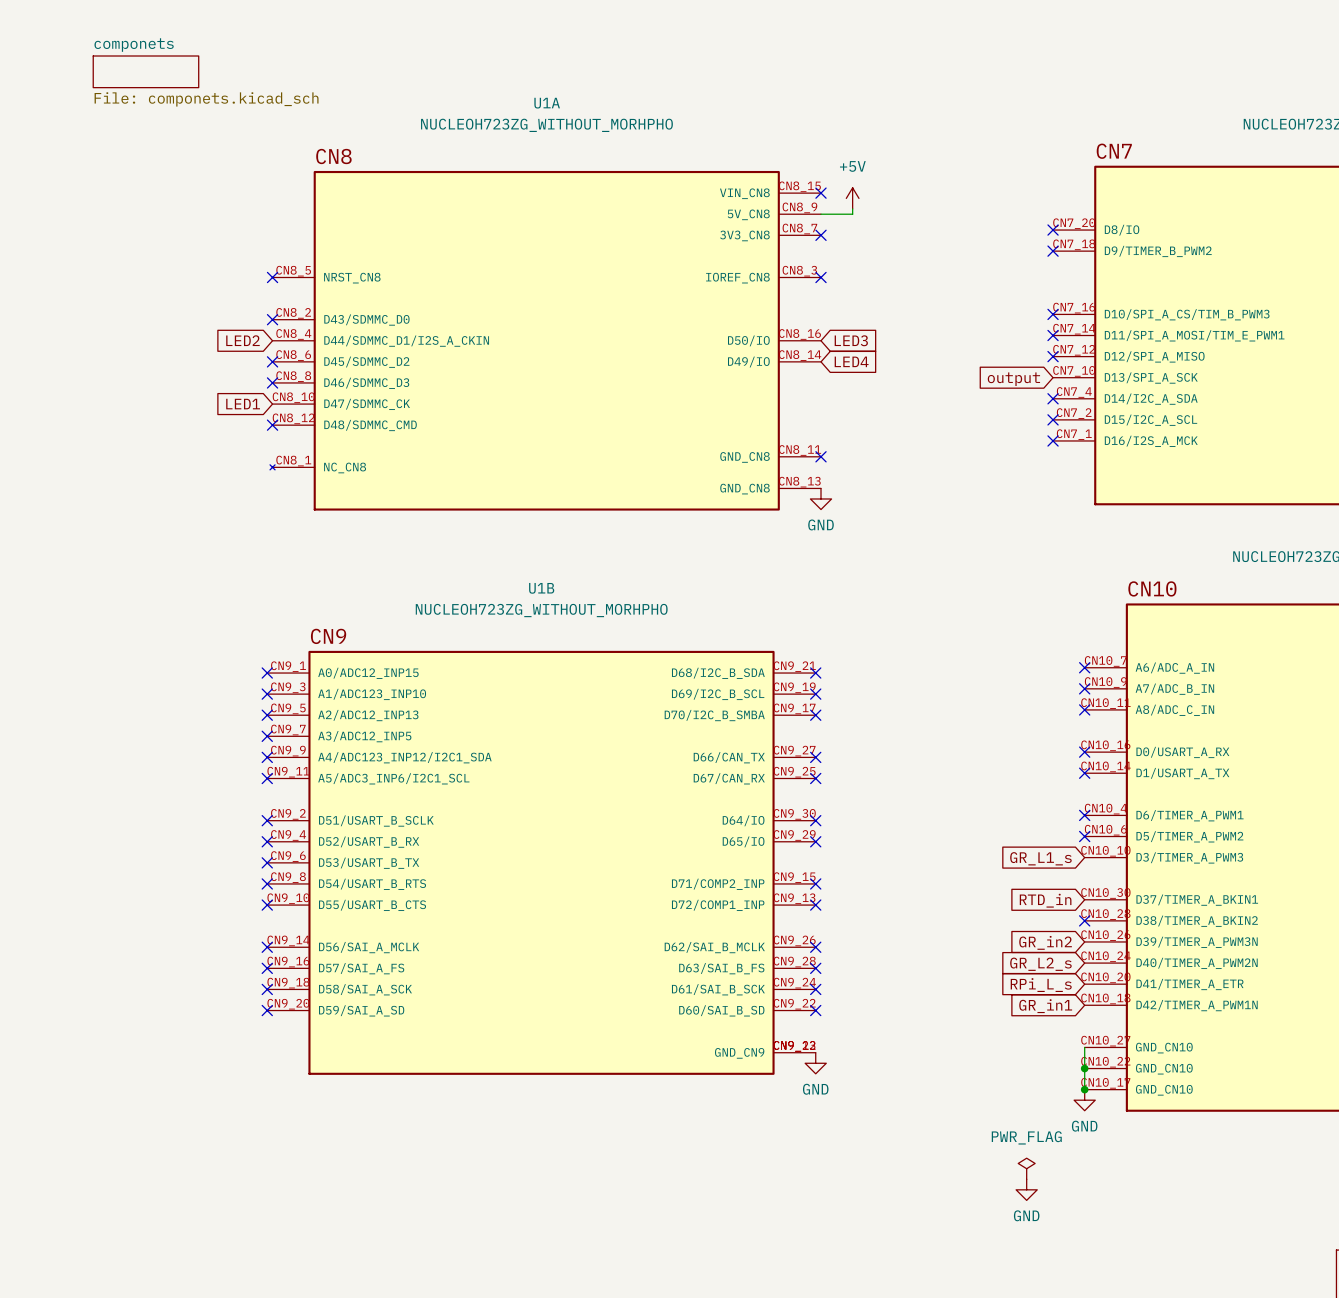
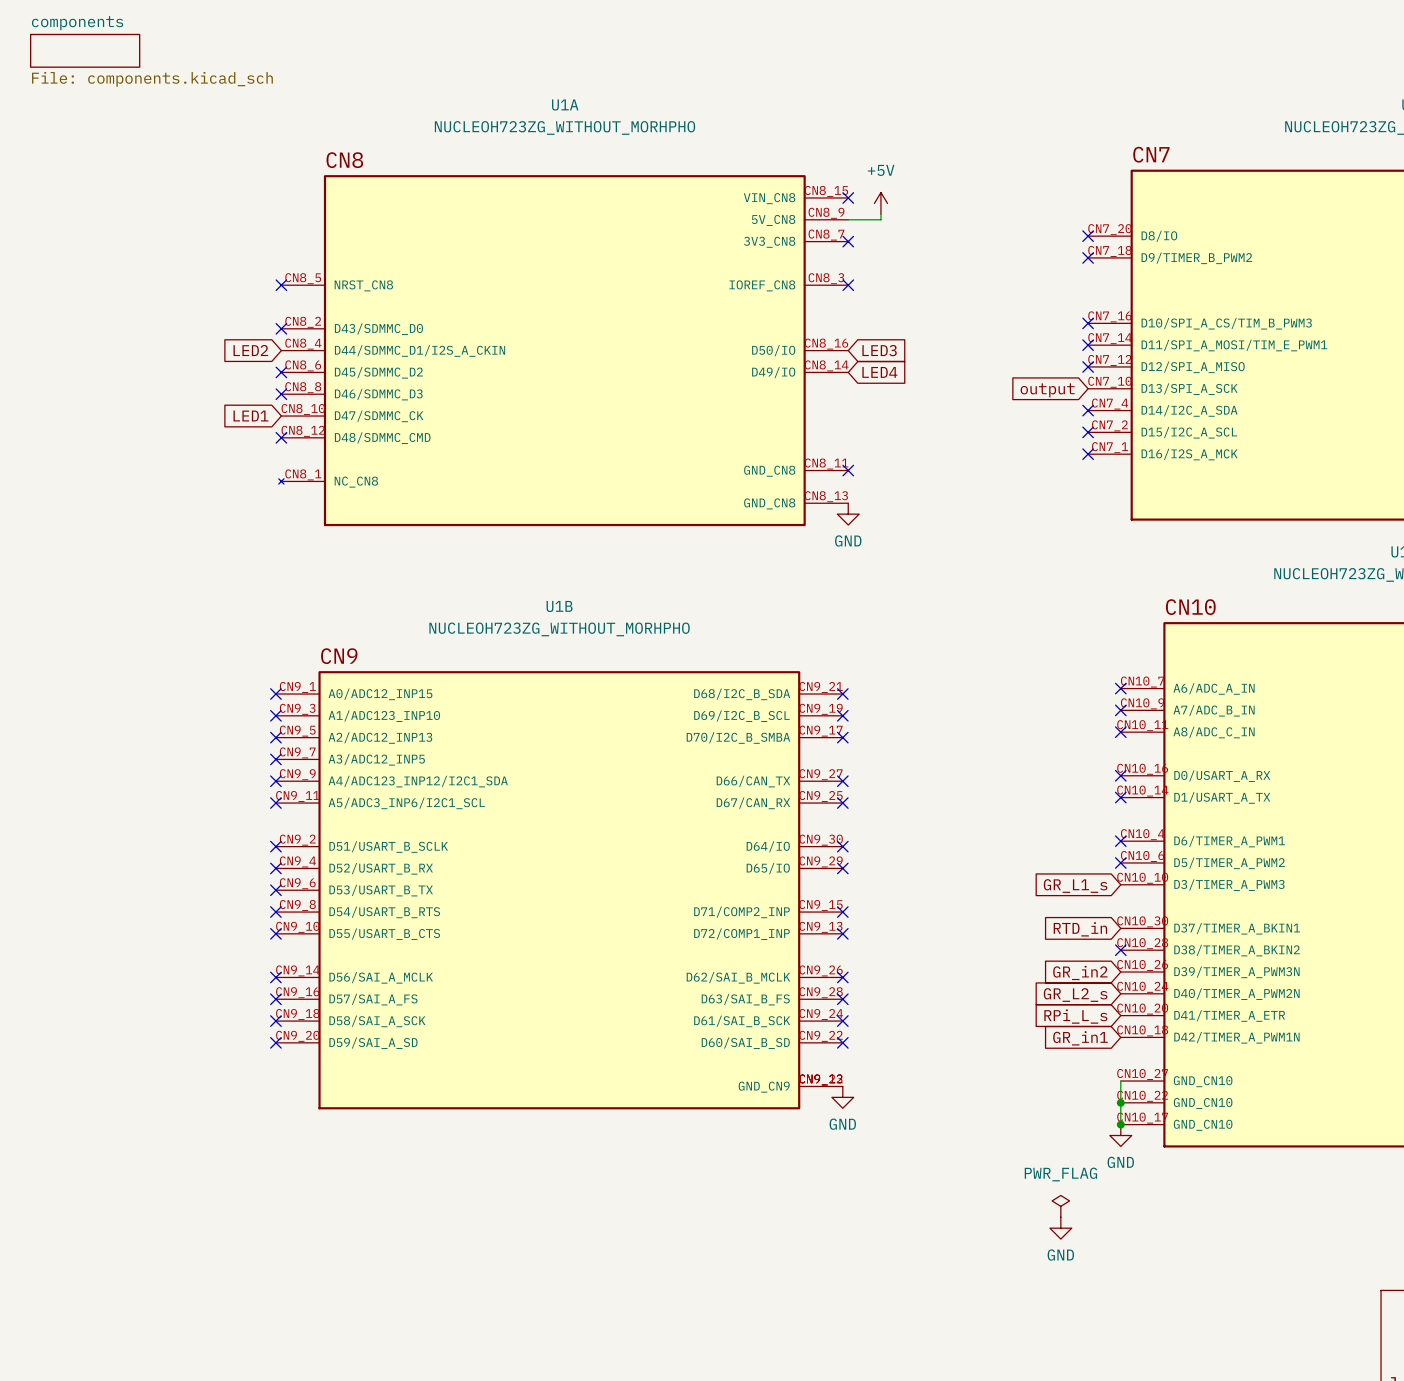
sheet components: none -> File: components.kicad_sch (85, 50)
sheet componets: File: componets.kicad_sch (145, 71) -> none

